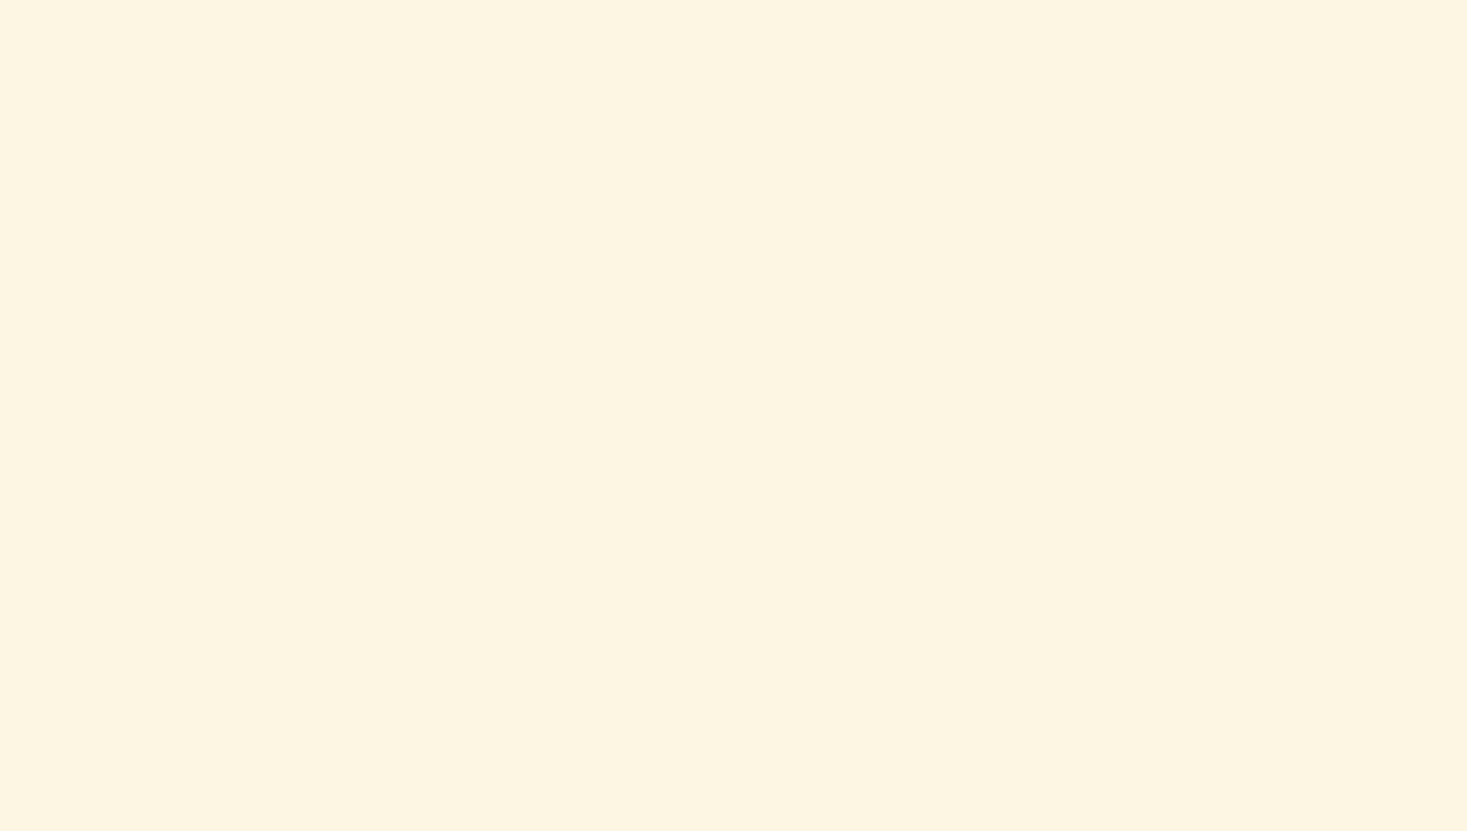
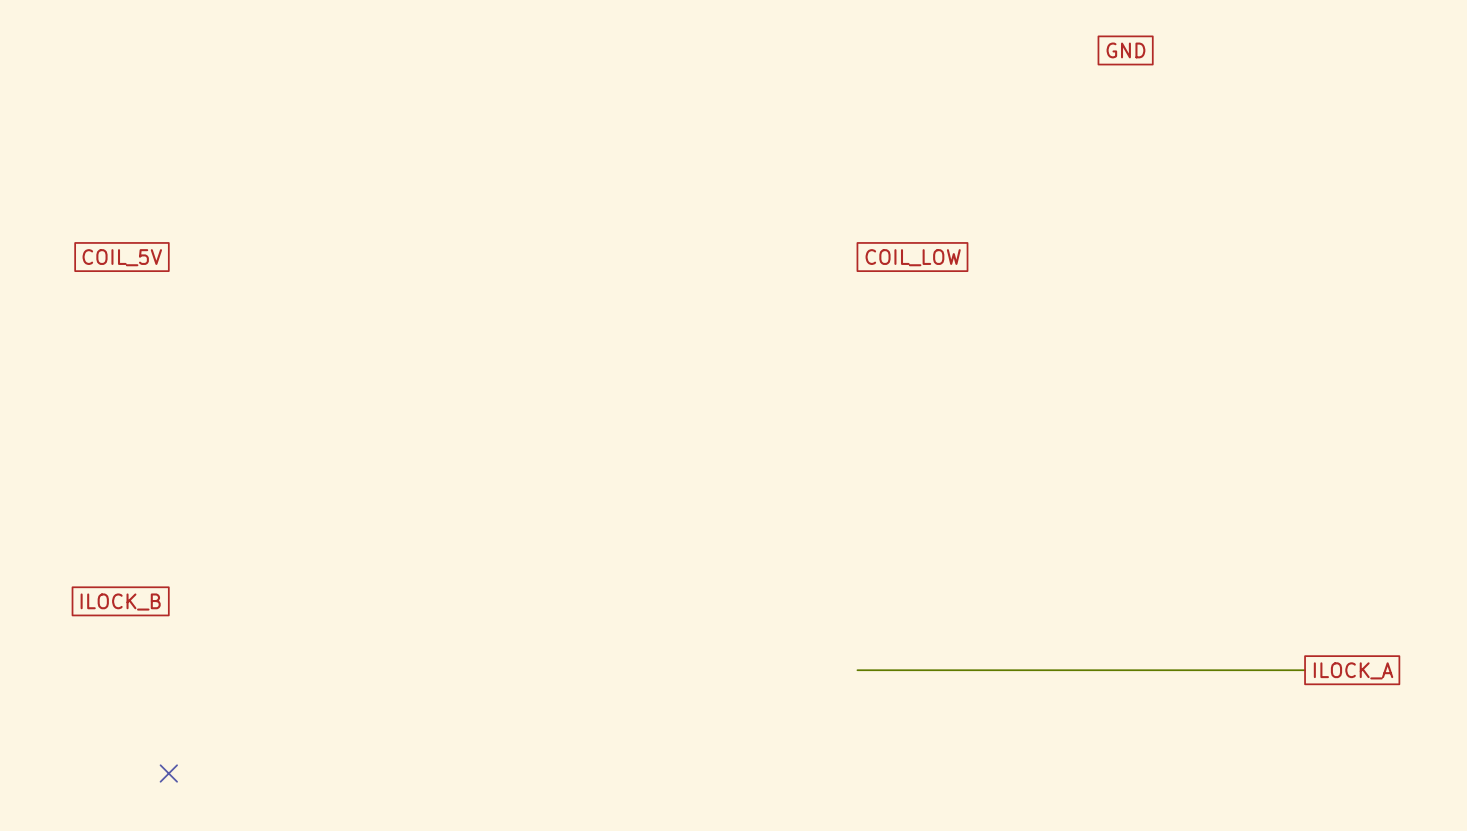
global label: none -> GND (1125, 50)
global label: none -> COIL_5V (122, 257)
global label: none -> COIL_LOW (913, 257)
global label: none -> ILOCK_B (120, 602)
wire: none -> (857, 670) (1305, 670)
global label: none -> ILOCK_A (1353, 670)
no-connect mark: none -> (168, 773)

